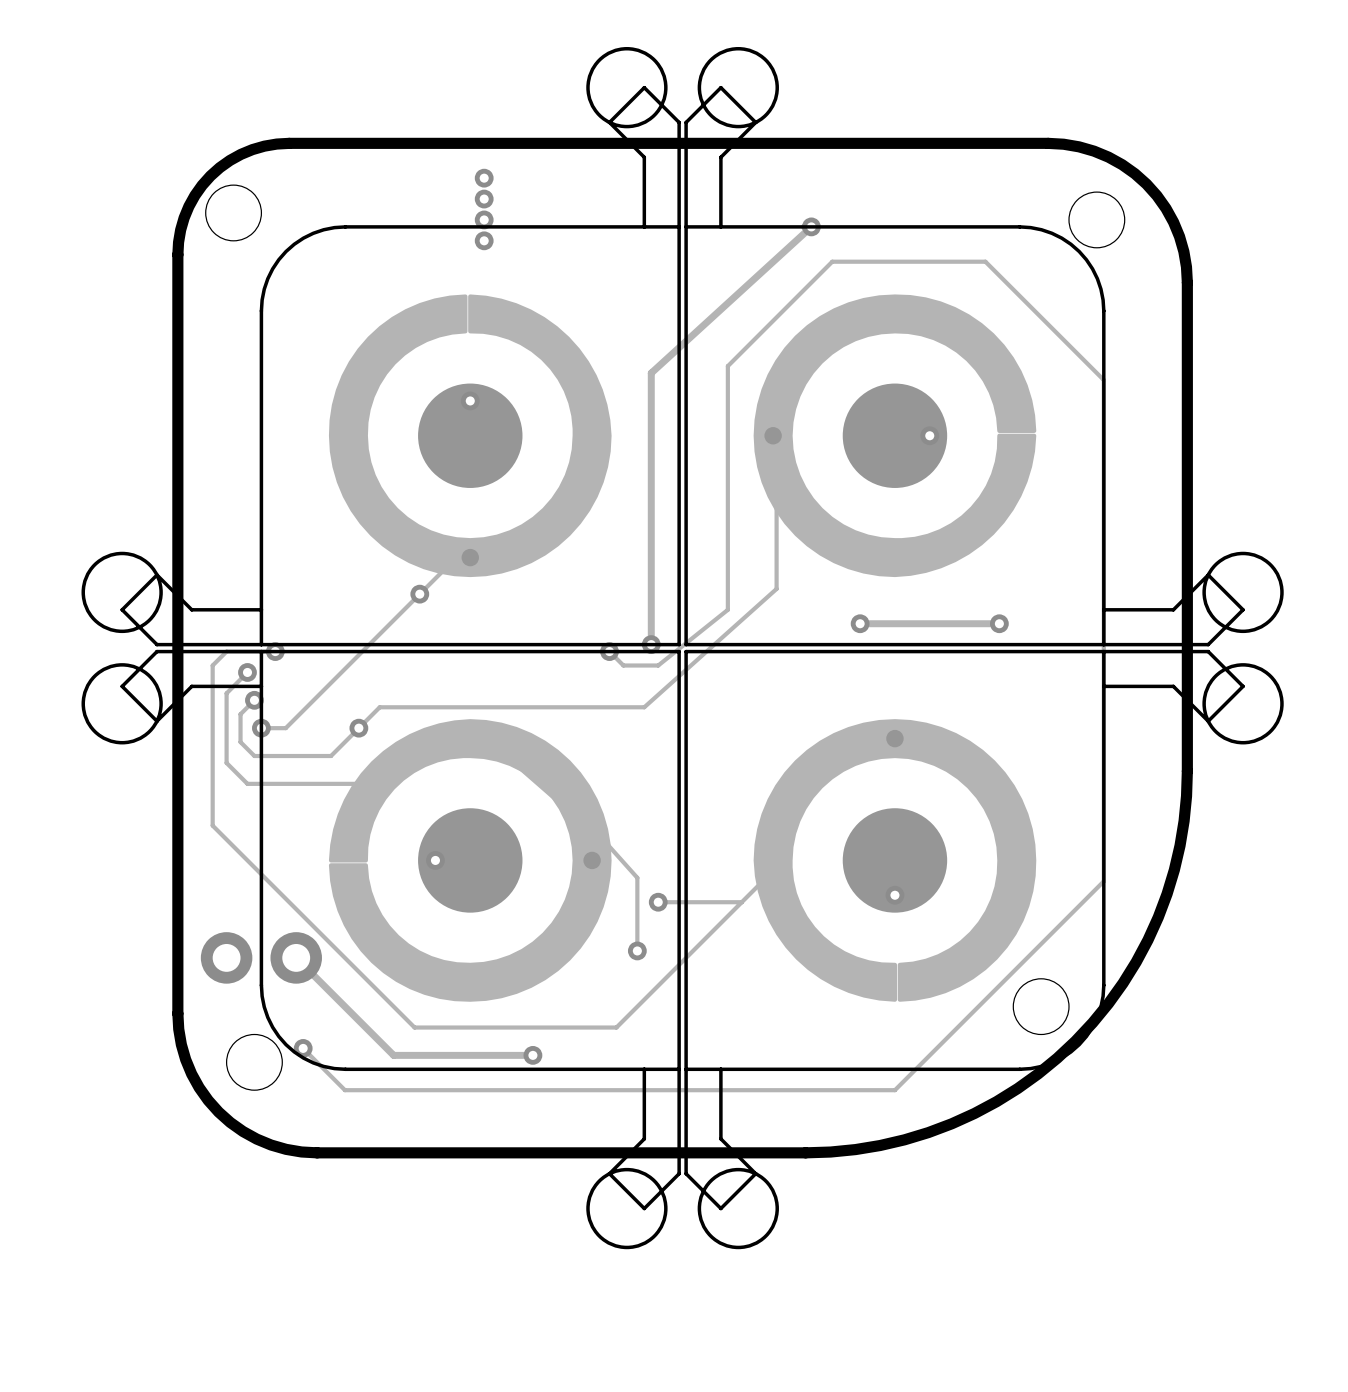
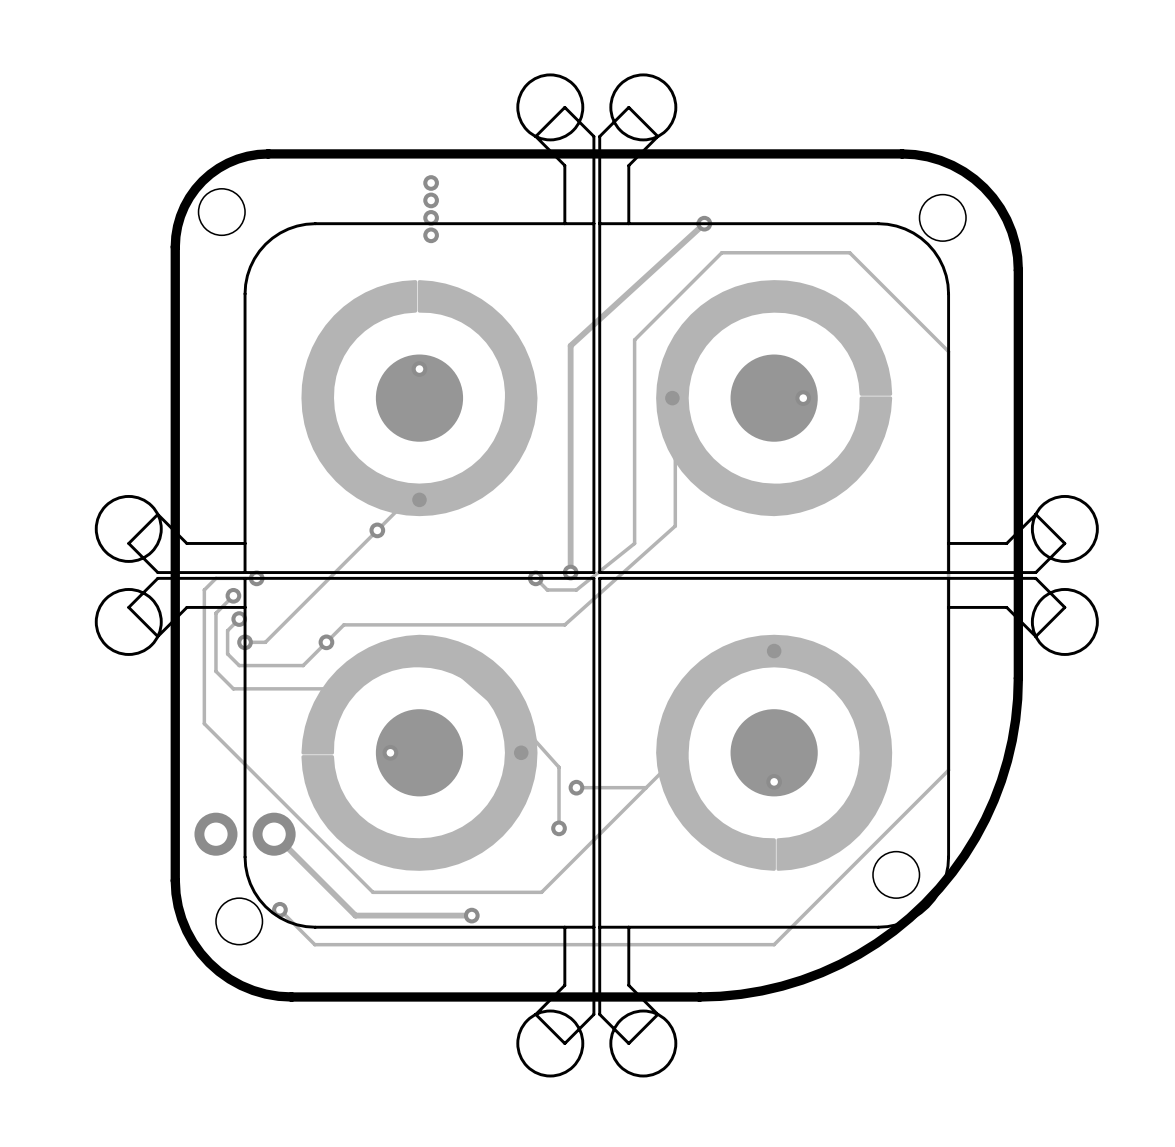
via: (860, 623) -> none
track: (999, 623) (860, 623) -> none
via: (999, 623) -> none

